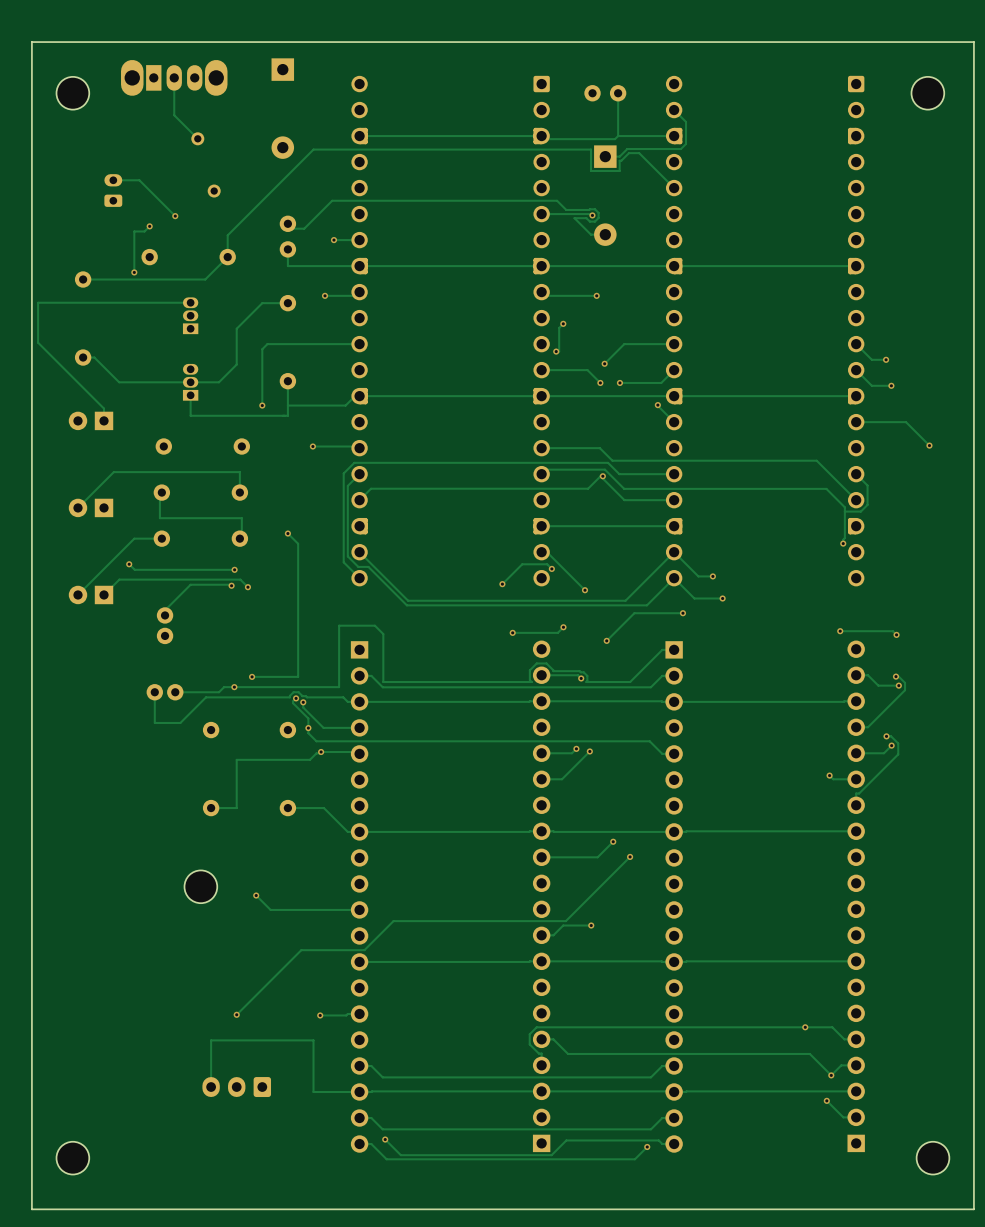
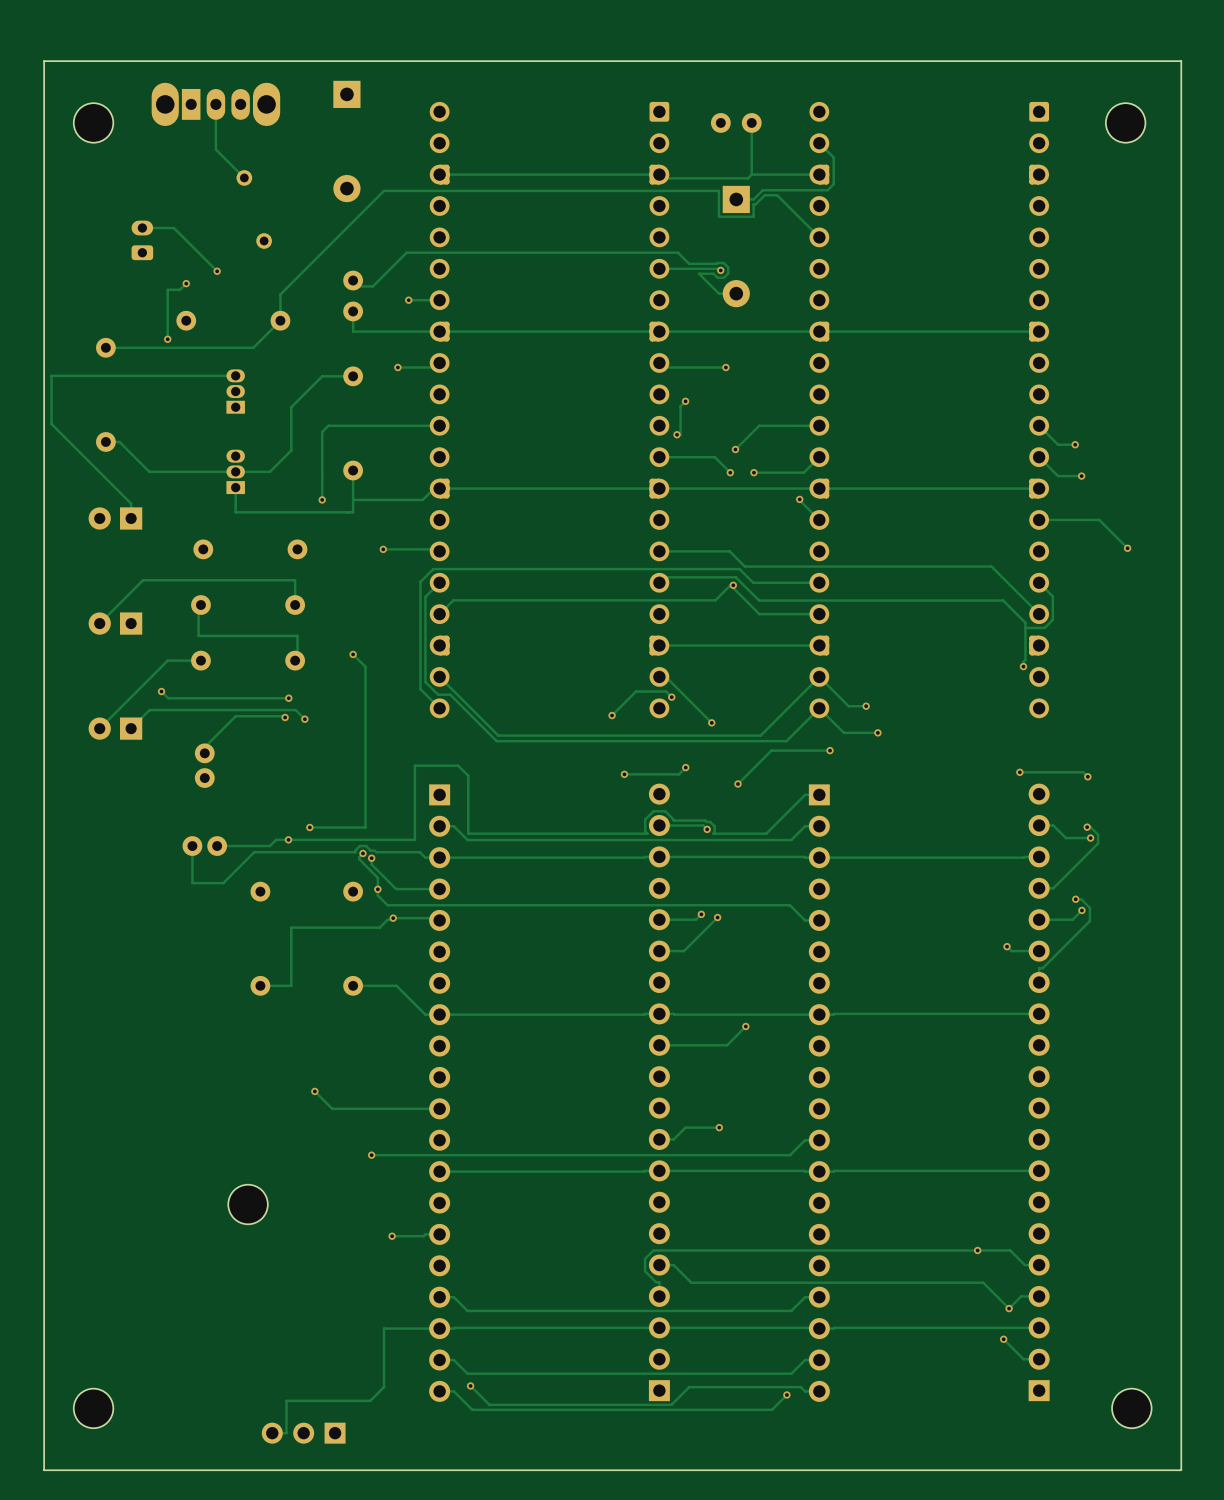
track: (630, 856) (565, 921) (393, 921) (364, 950) (301, 950) (236, 1014) -> none
via: (630, 856) -> none
part position: (200, 886) -> (248, 1204)
track: none -> (819, 1140) (805, 1140) (790, 1155) (371, 1155)
via: none -> (371, 1155)
via: (236, 1014) -> none
track: (211, 1087) (211, 1040) (313, 1040) (313, 1092) -> (272, 1433) (286, 1433) (286, 1400) (370, 1400) (384, 1387) (384, 1328)
part: (236, 1087) -> none
part: none -> (303, 1433)

